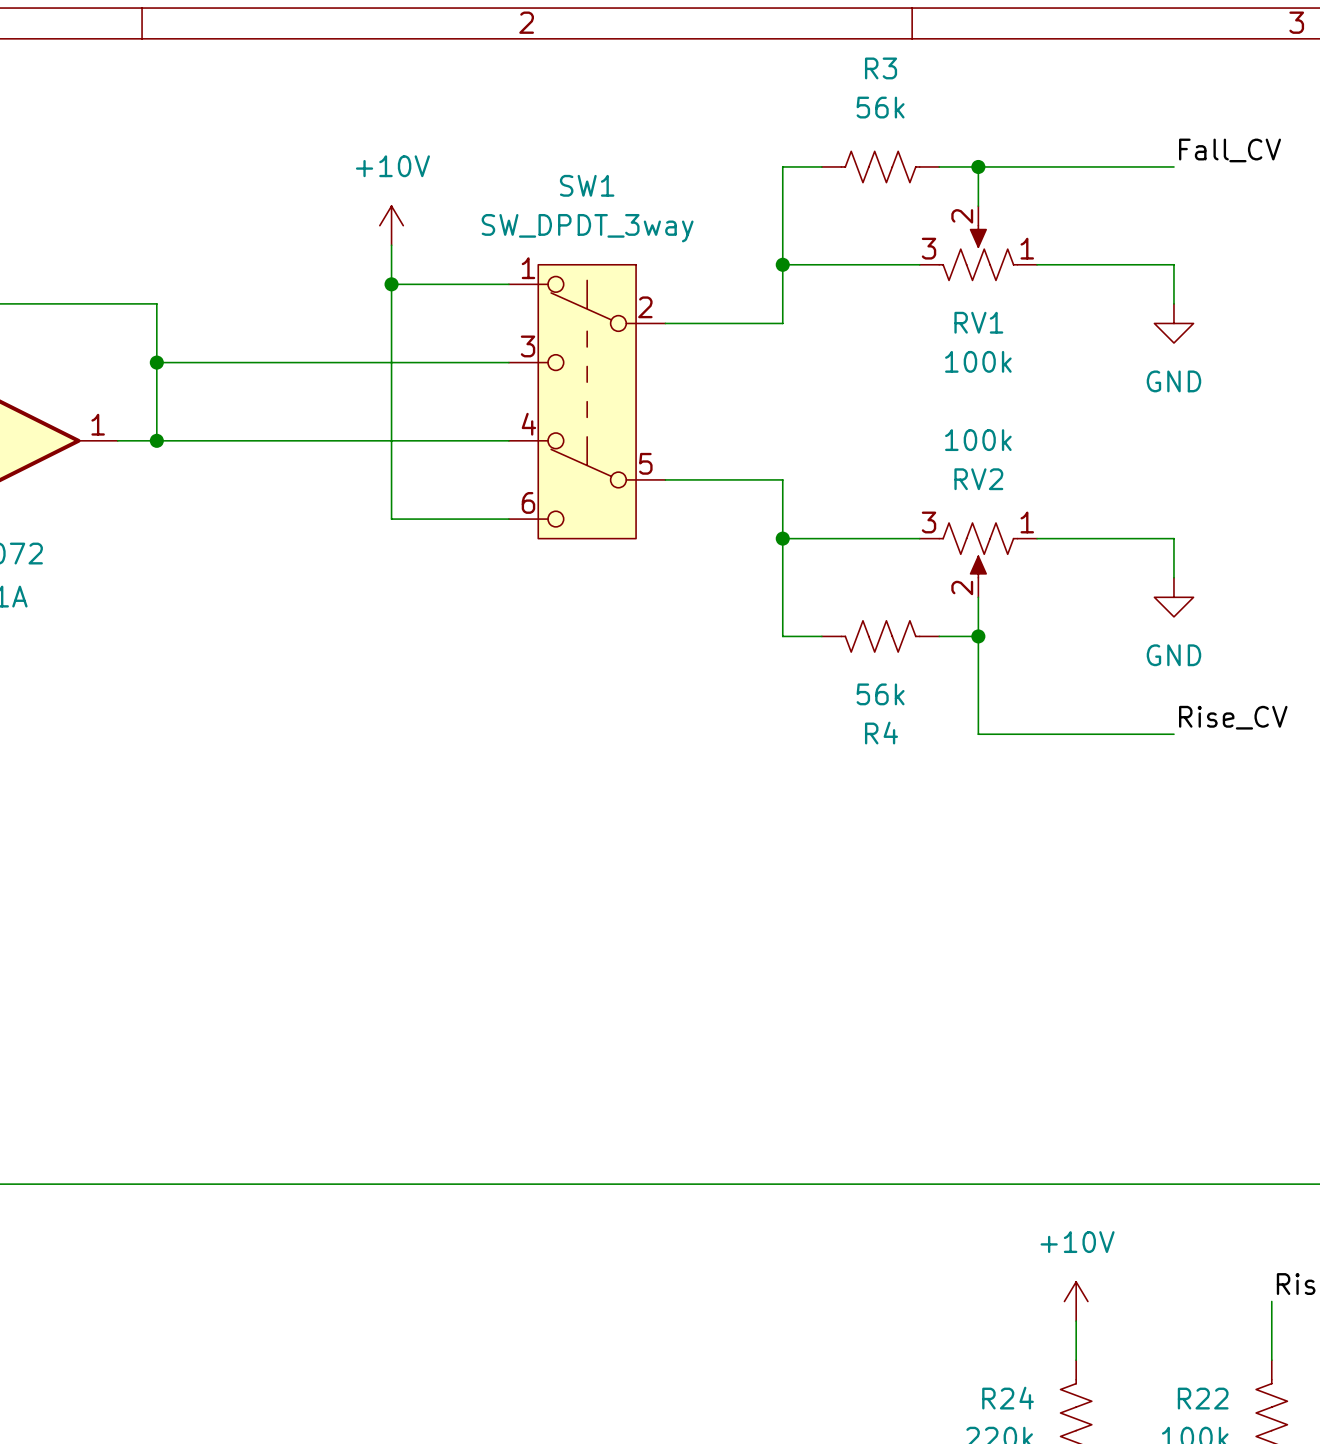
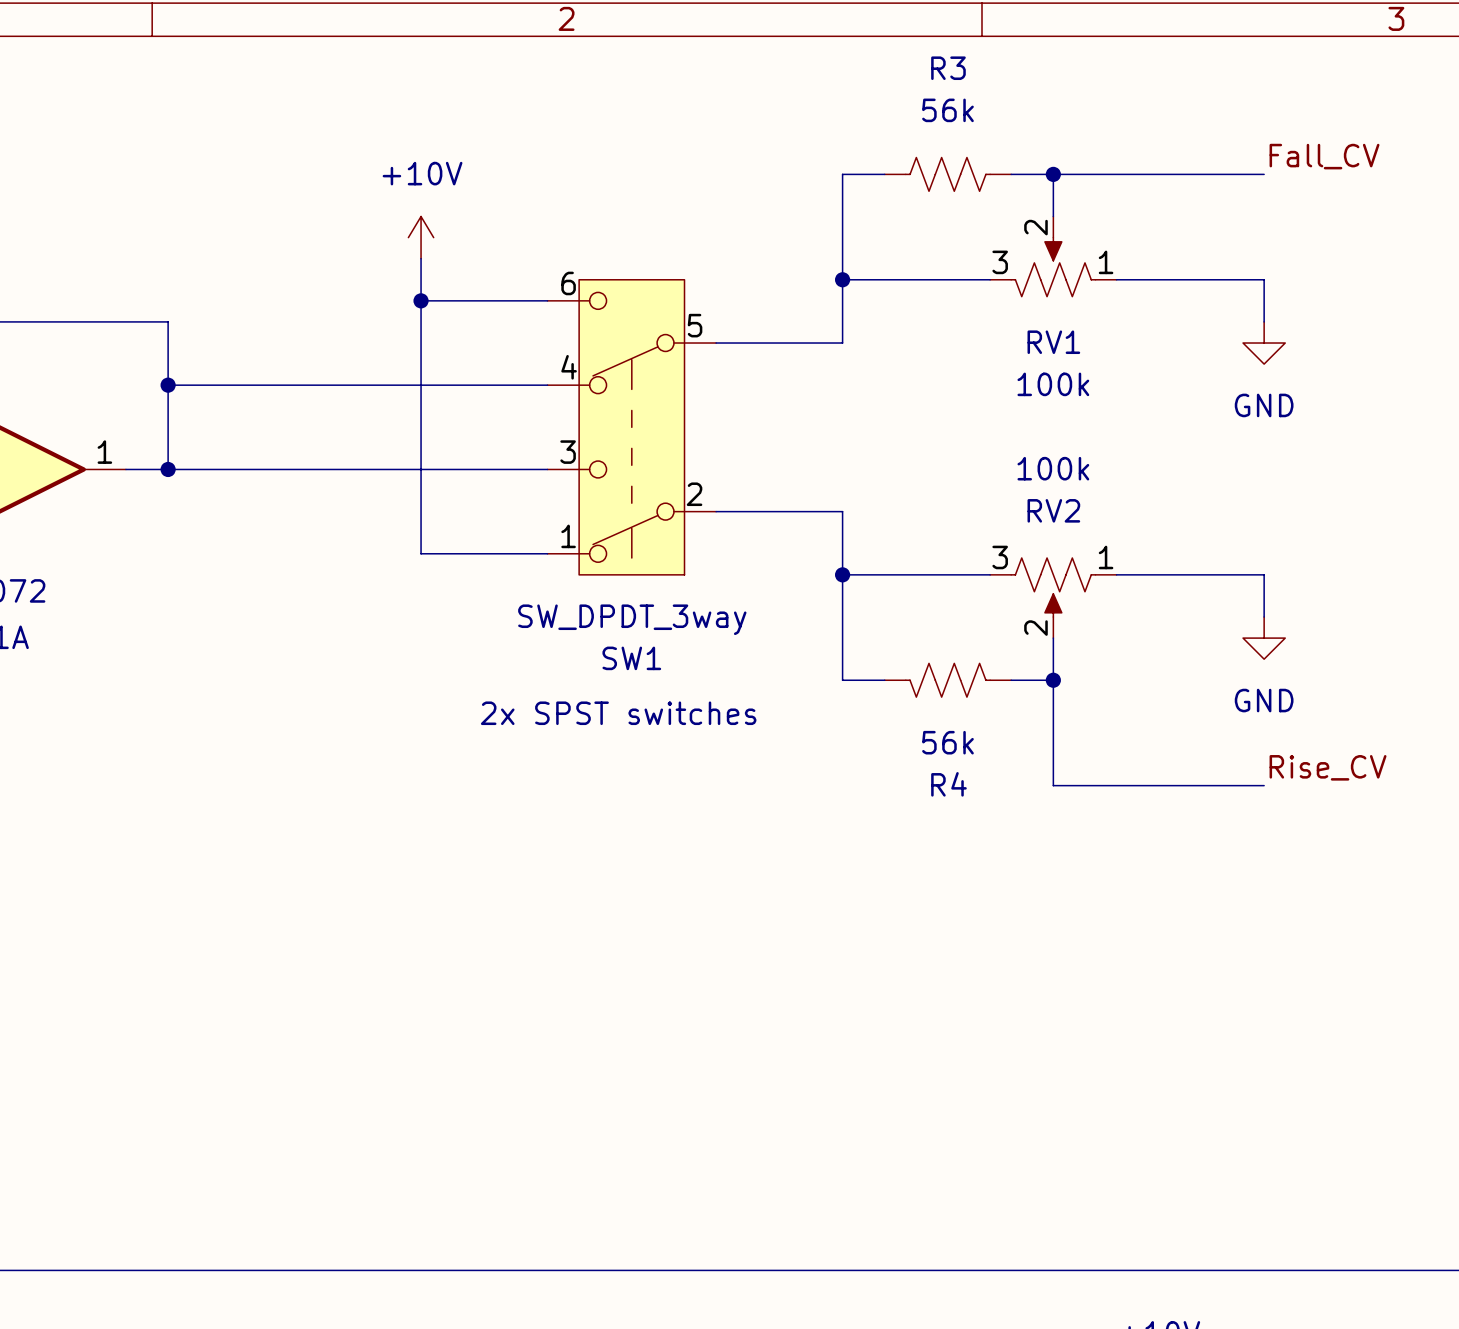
SW1 flip: as is (587, 401) -> up-down (631, 427)
text: none -> 2x SPST switches (618, 713)

